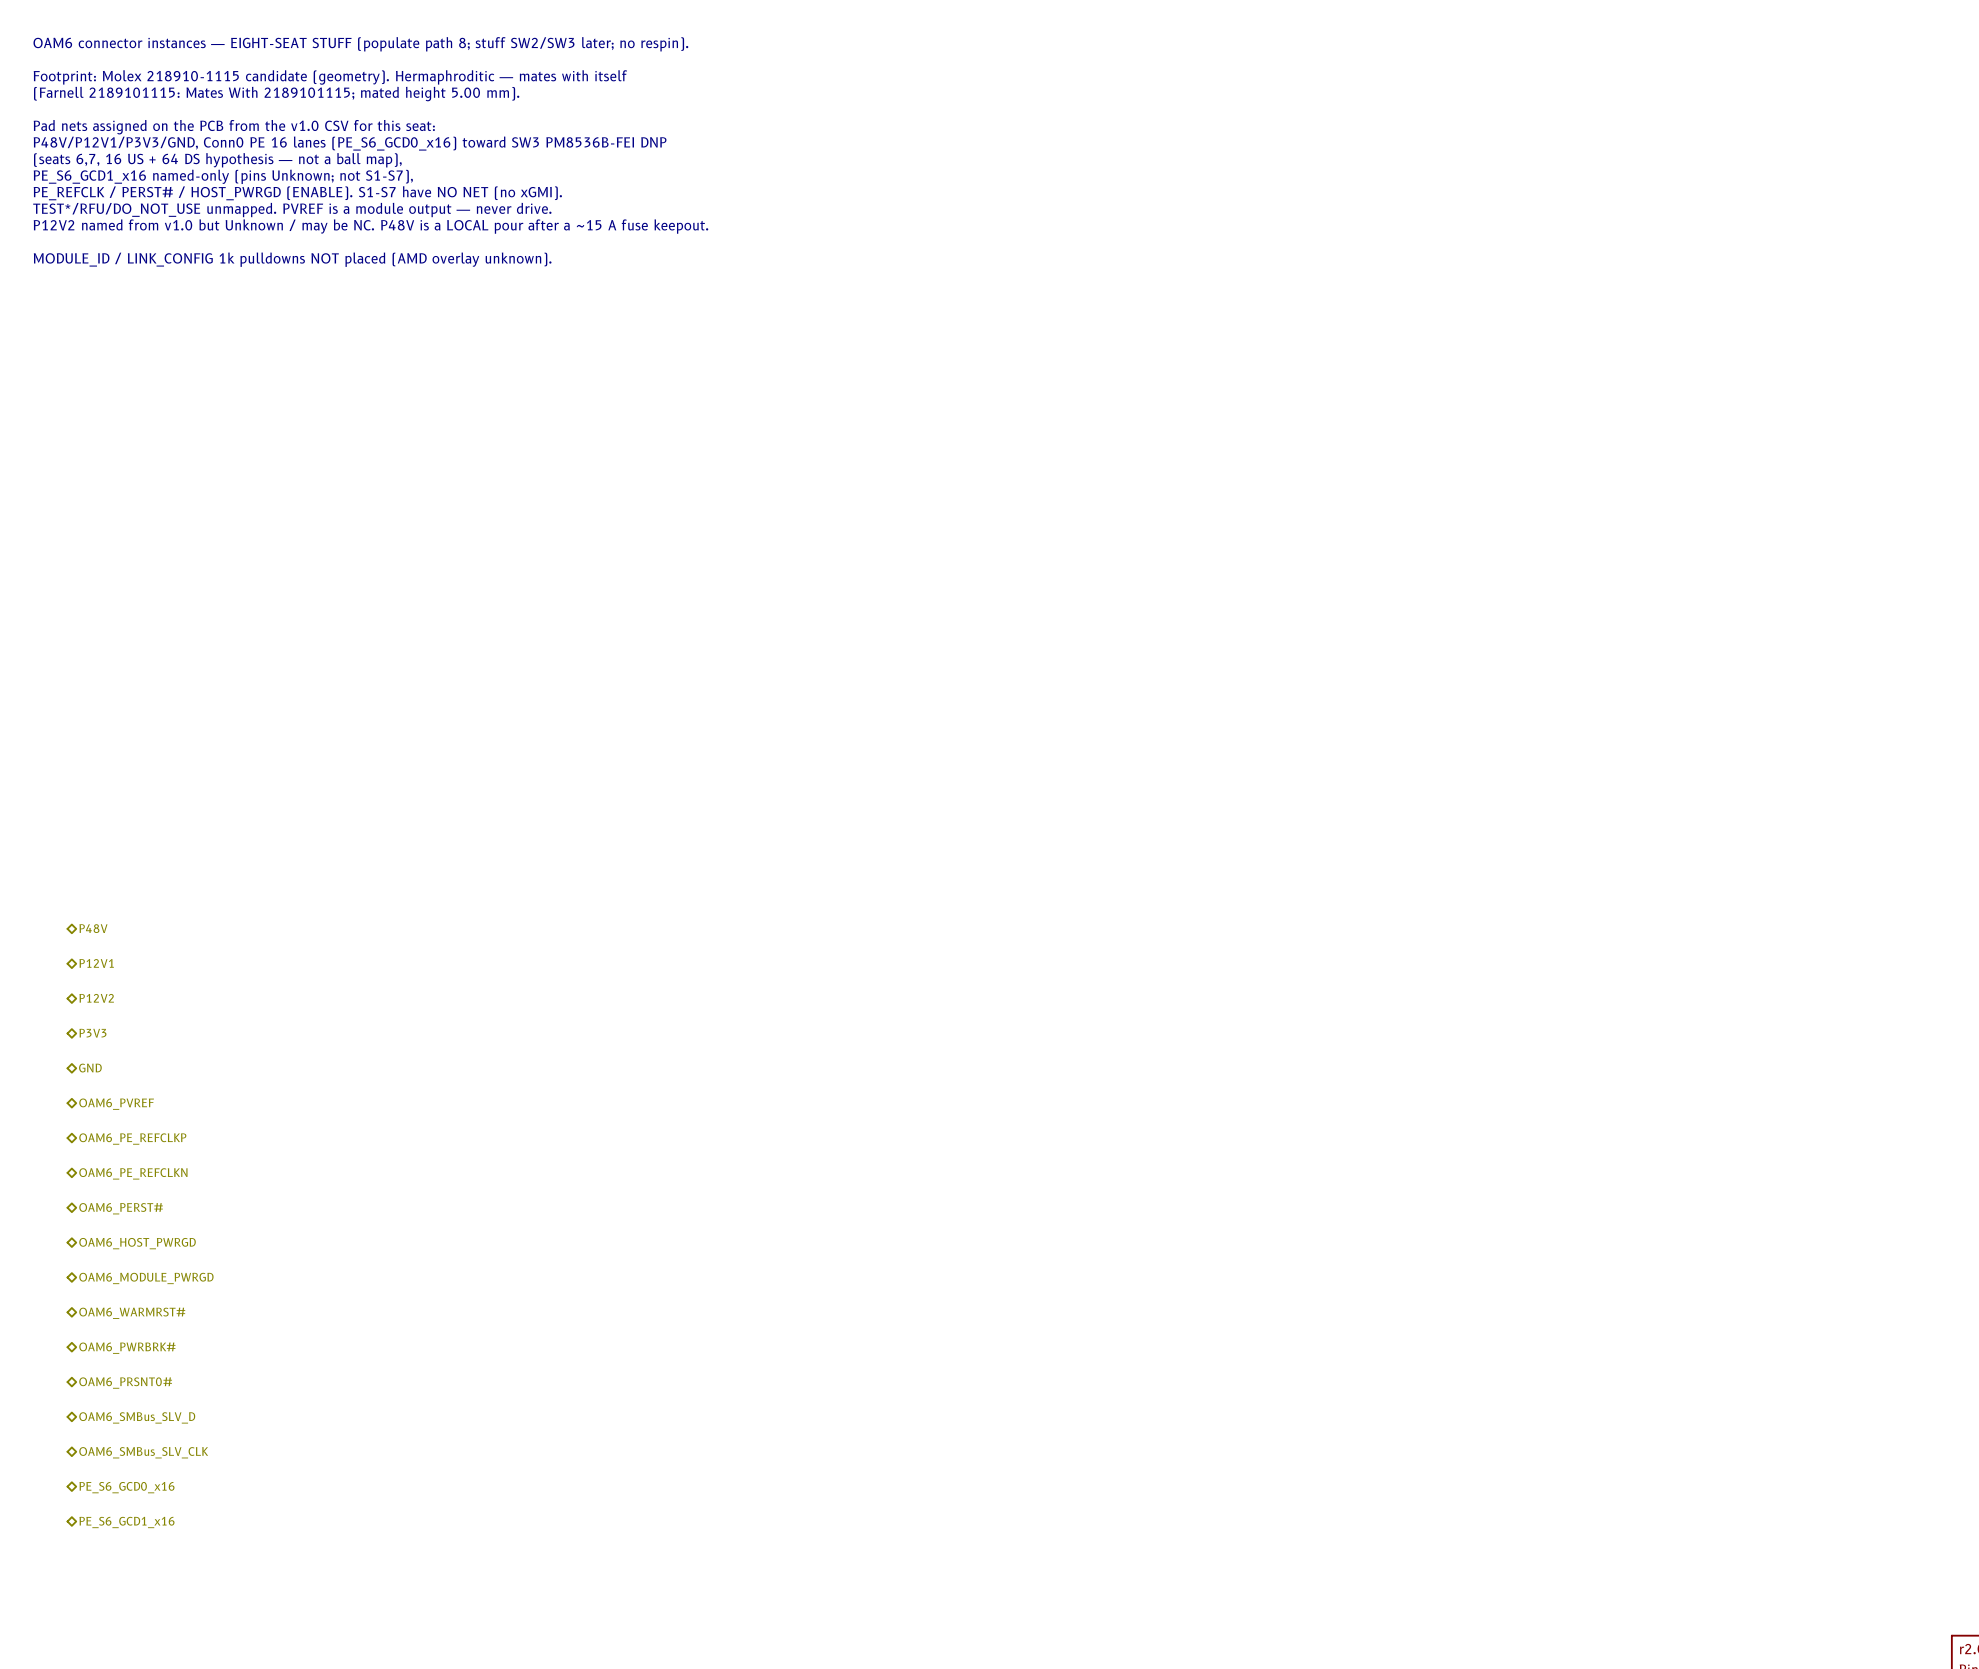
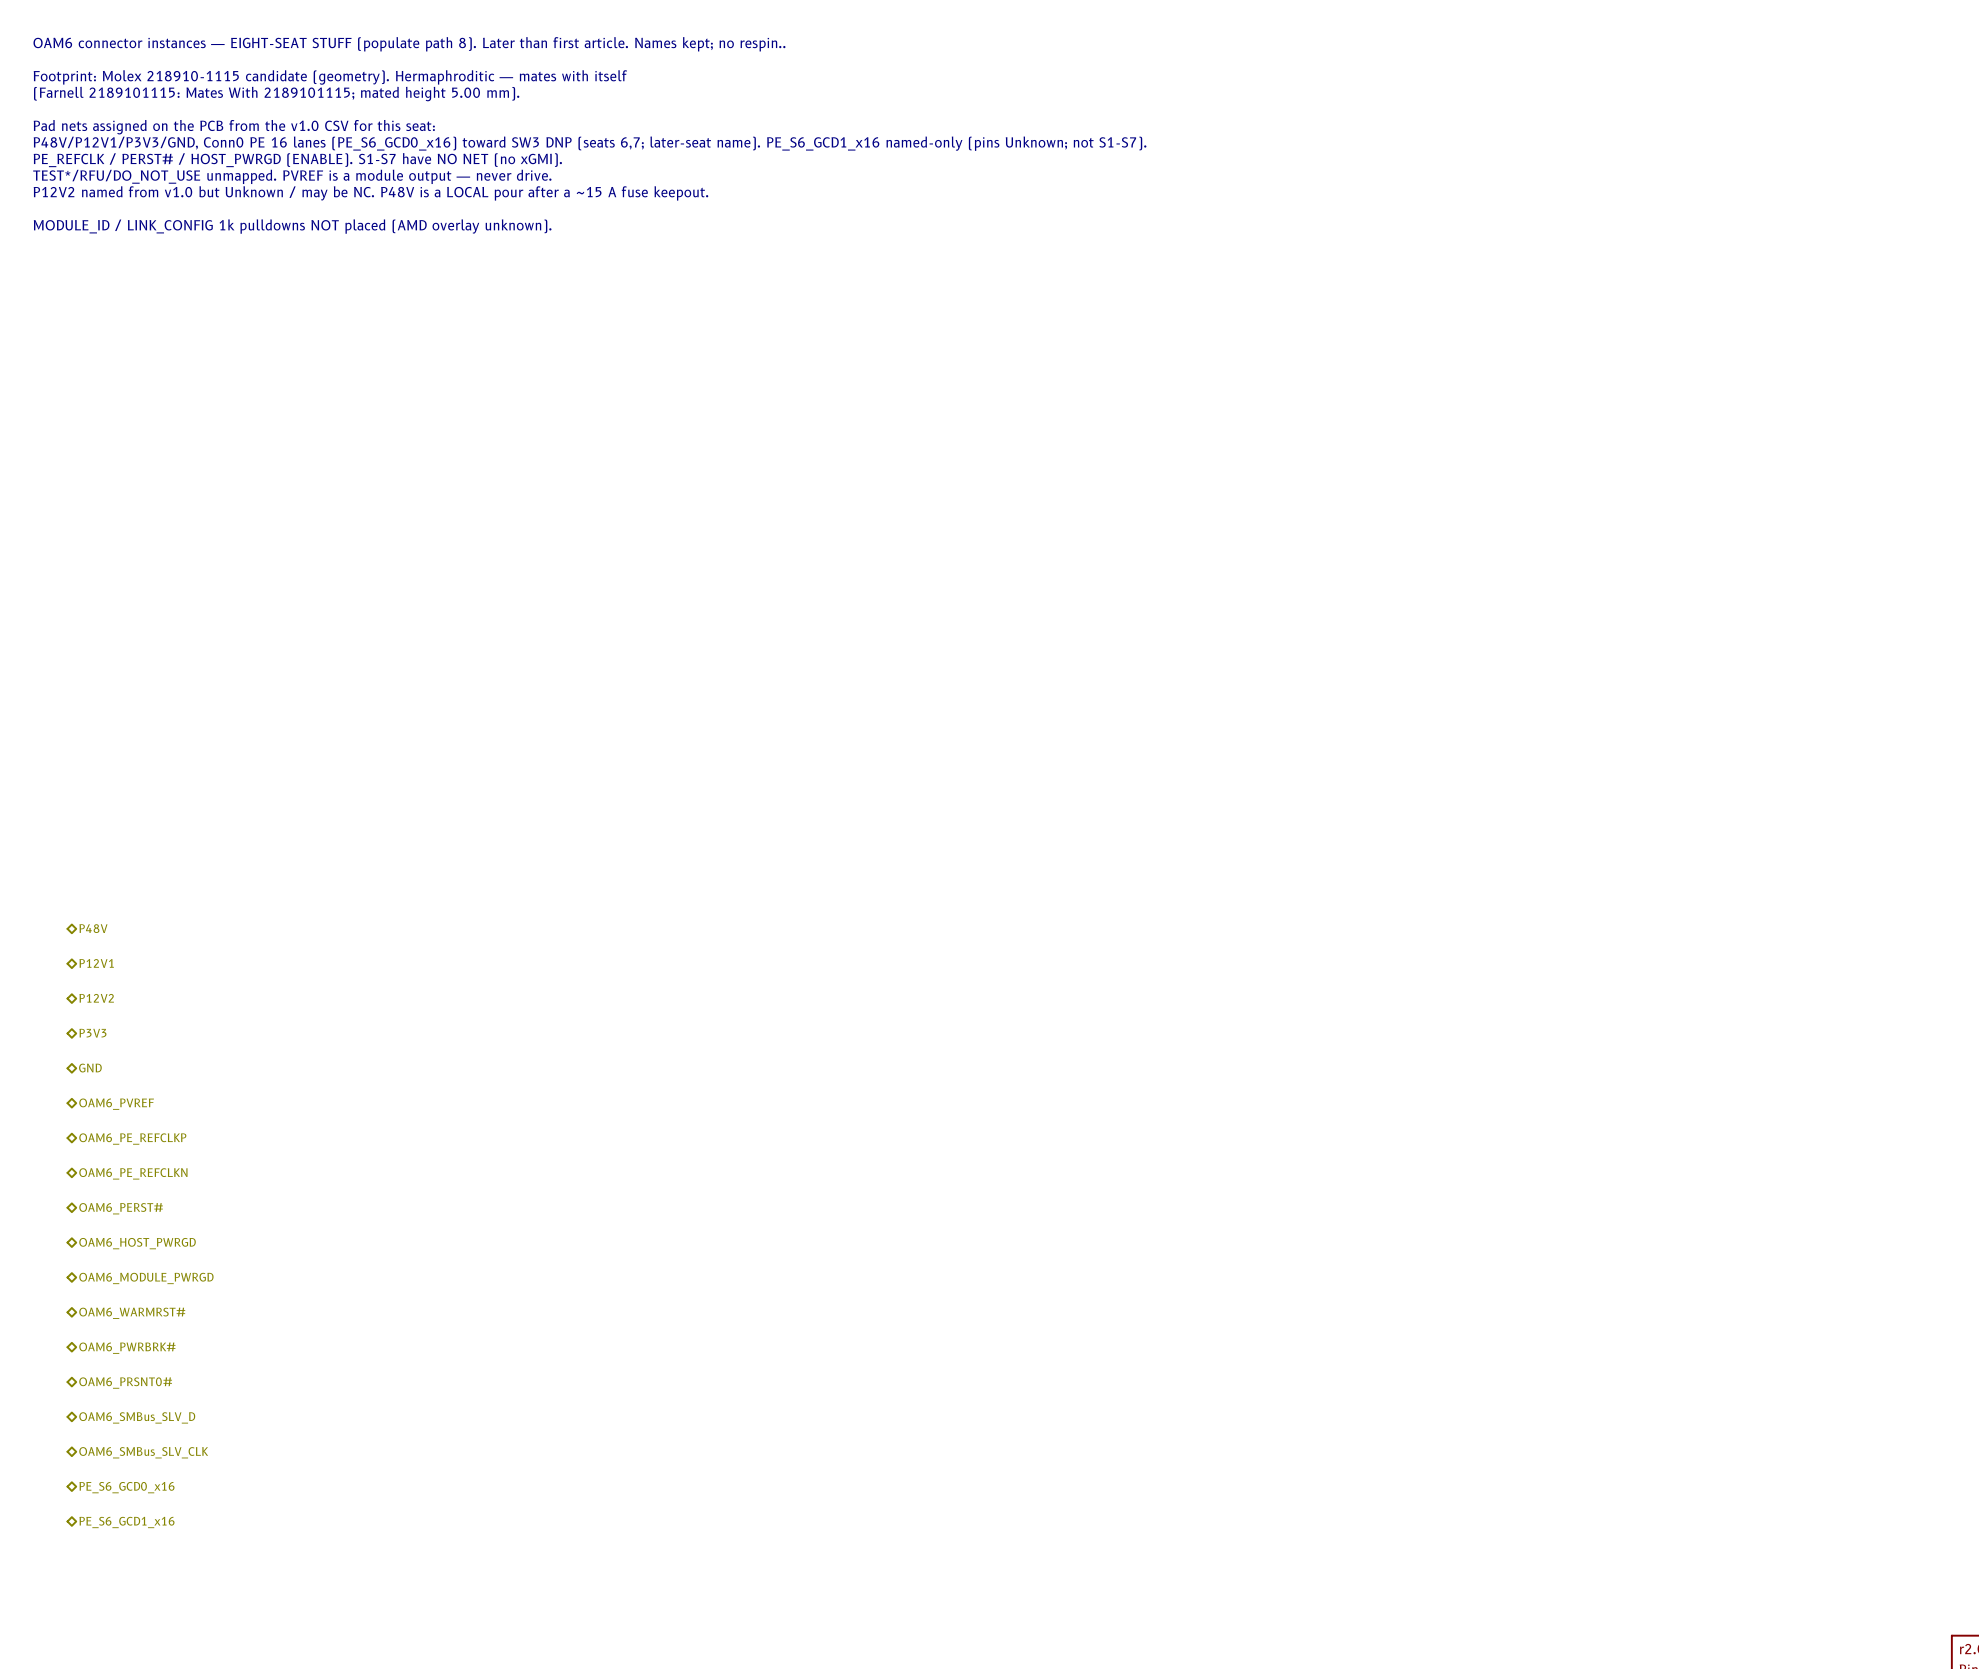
text: OAM6 connector instances — EIGHT-SEAT STUFF (populate path 8; stuff SW2/SW3 later; no respin). (360, 44) -> OAM6 connector instances — EIGHT-SEAT STUFF (populate path 8). Later than first article. Names kept; no respin.. (409, 44)
text: P48V/P12V1/P3V3/GND, Conn0 PE 16 lanes (PE_S6_GCD0_x16) toward SW3 PM8536B-FEI DNP (350, 143) -> P48V/P12V1/P3V3/GND, Conn0 PE 16 lanes (PE_S6_GCD0_x16) toward SW3 DNP (seats 6,7; later-seat name). PE_S6_GCD1_x16 named-only (pins Unknown; not S1-S7). (590, 143)
text: (seats 6,7, 16 US + 64 DS hypothesis — not a ball map), (217, 160) -> PE_REFCLK / PERST# / HOST_PWRGD (ENABLE). S1-S7 have NO NET (no xGMI). (297, 160)
text: PE_S6_GCD1_x16 named-only (pins Unknown; not S1-S7), (223, 176) -> TEST*/RFU/DO_NOT_USE unmapped. PVREF is a module output — never drive. (292, 176)
text: PE_REFCLK / PERST# / HOST_PWRGD (ENABLE). S1-S7 have NO NET (no xGMI). (297, 193) -> P12V2 named from v1.0 but Unknown / may be NC. P48V is a LOCAL pour after a ~15 A fuse keepout. (370, 193)
text: TEST*/RFU/DO_NOT_USE unmapped. PVREF is a module output — never drive. (292, 210) -> none
text: P12V2 named from v1.0 but Unknown / may be NC. P48V is a LOCAL pour after a ~15 A fuse keepout. (370, 226) -> MODULE_ID / LINK_CONFIG 1k pulldowns NOT placed (AMD overlay unknown). (292, 226)
text: MODULE_ID / LINK_CONFIG 1k pulldowns NOT placed (AMD overlay unknown). (292, 259) -> none

